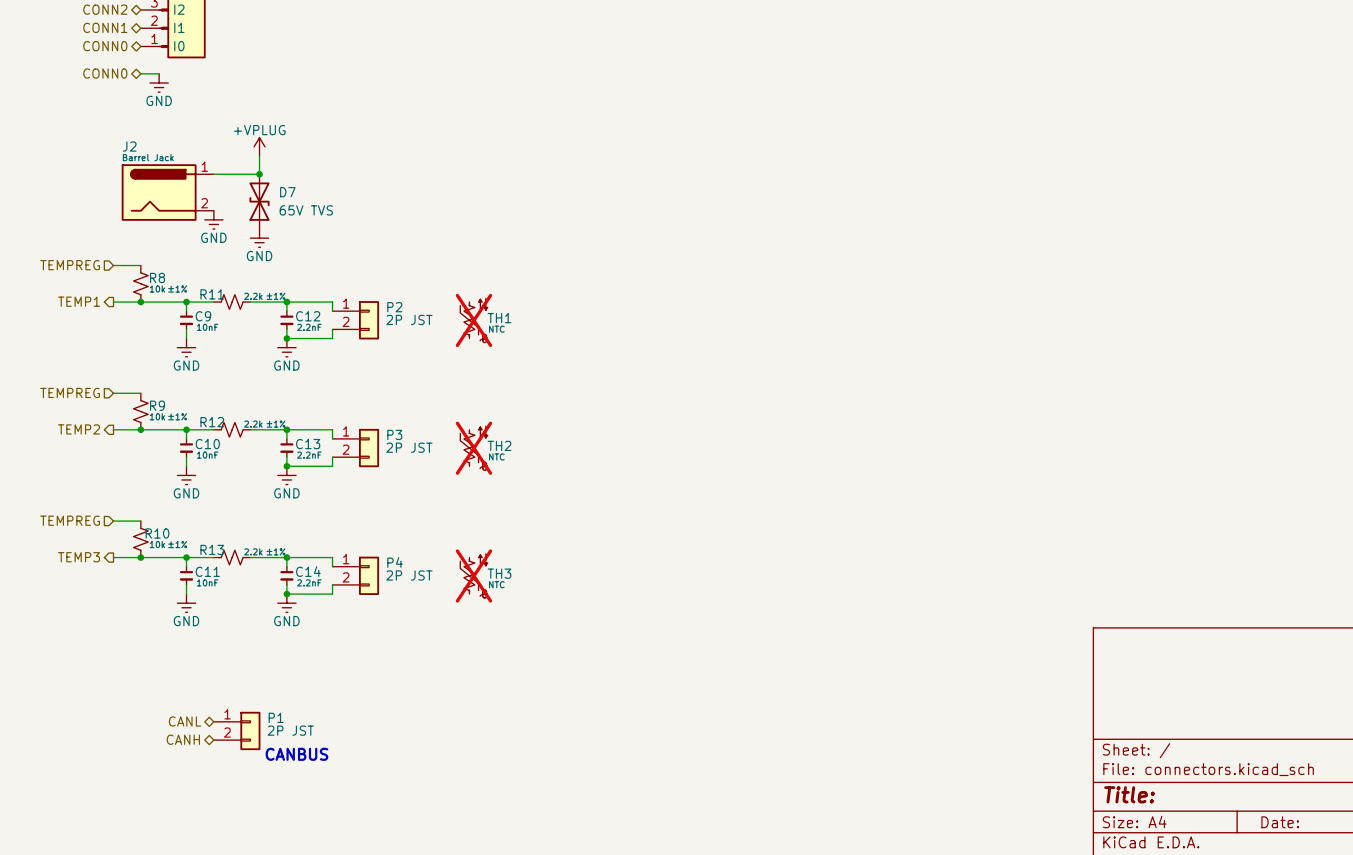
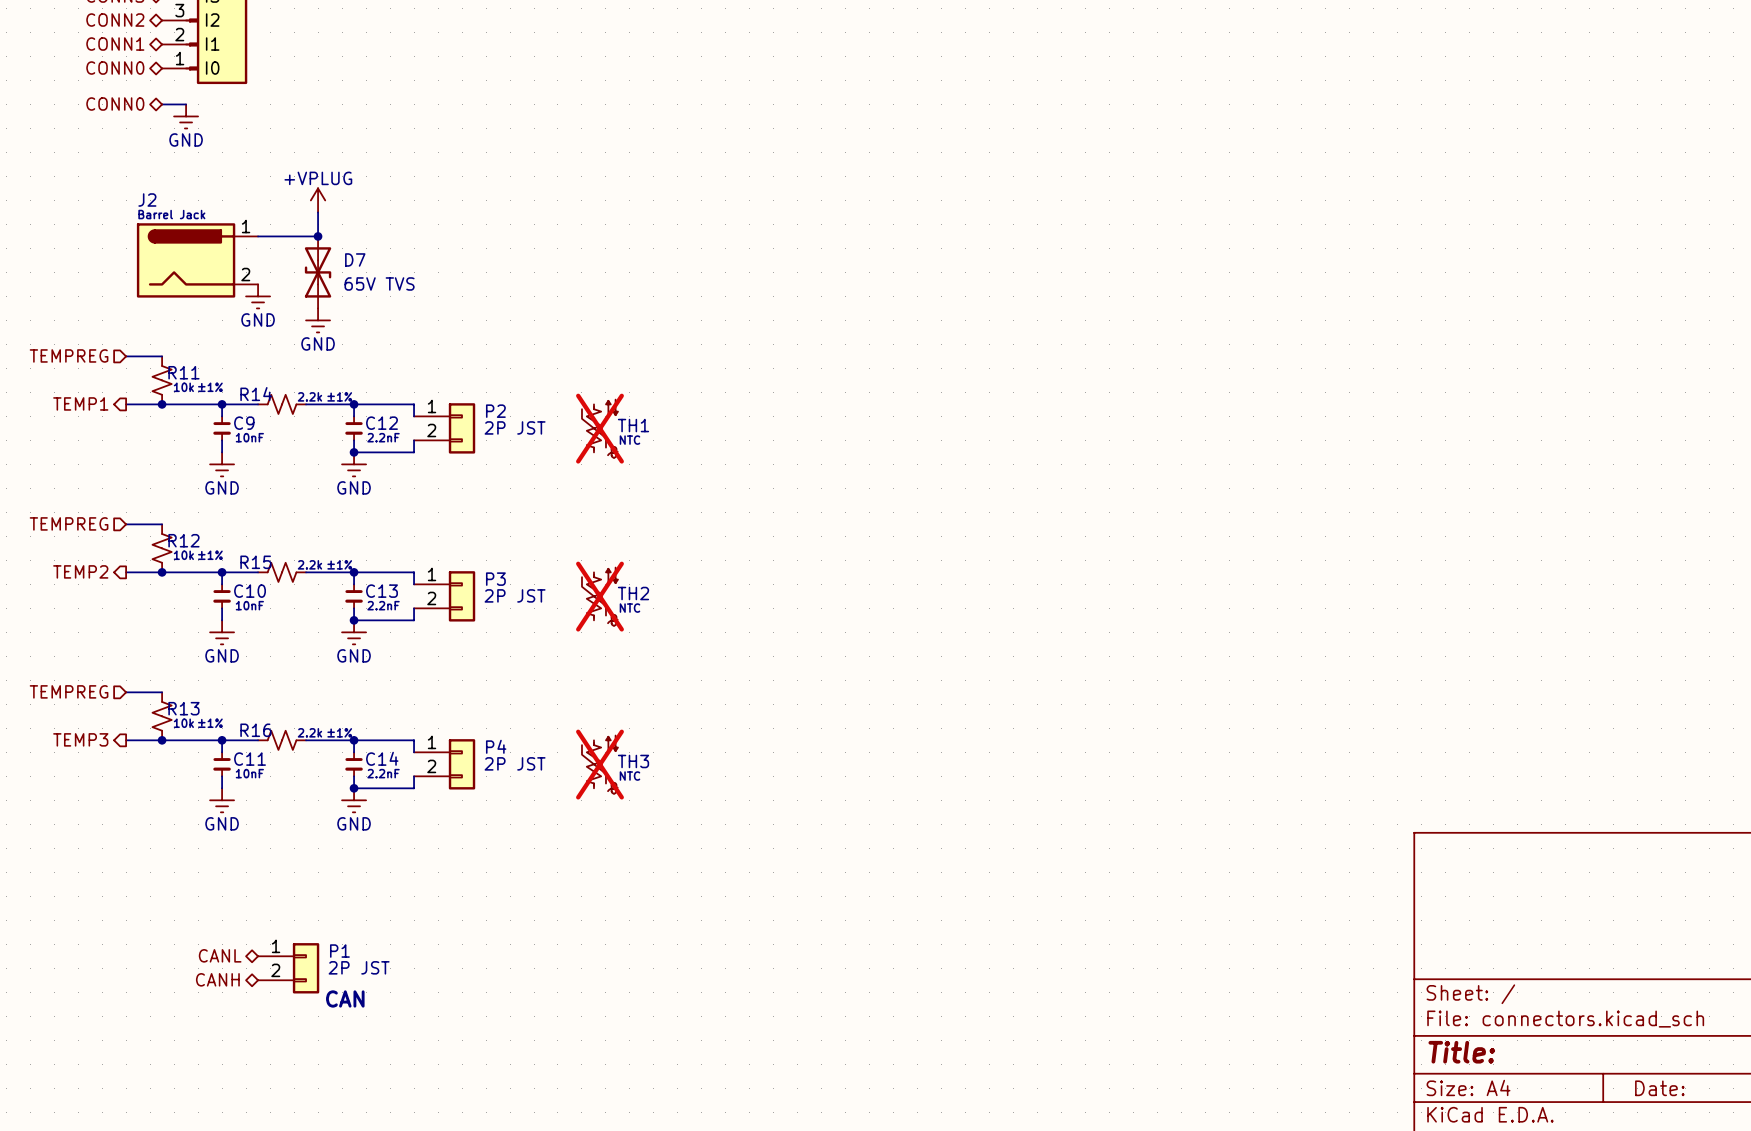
R8 name: R8 (157, 277) -> R11 (183, 372)
R11 name: R11 (212, 294) -> R14 (256, 394)
R9 name: R9 (157, 405) -> R12 (183, 540)
R12 name: R12 (212, 422) -> R15 (255, 562)
R10 name: R10 (157, 533) -> R13 (183, 708)
R13 name: R13 (212, 549) -> R16 (255, 730)
text: CANBUS (296, 754) -> CAN (345, 998)

